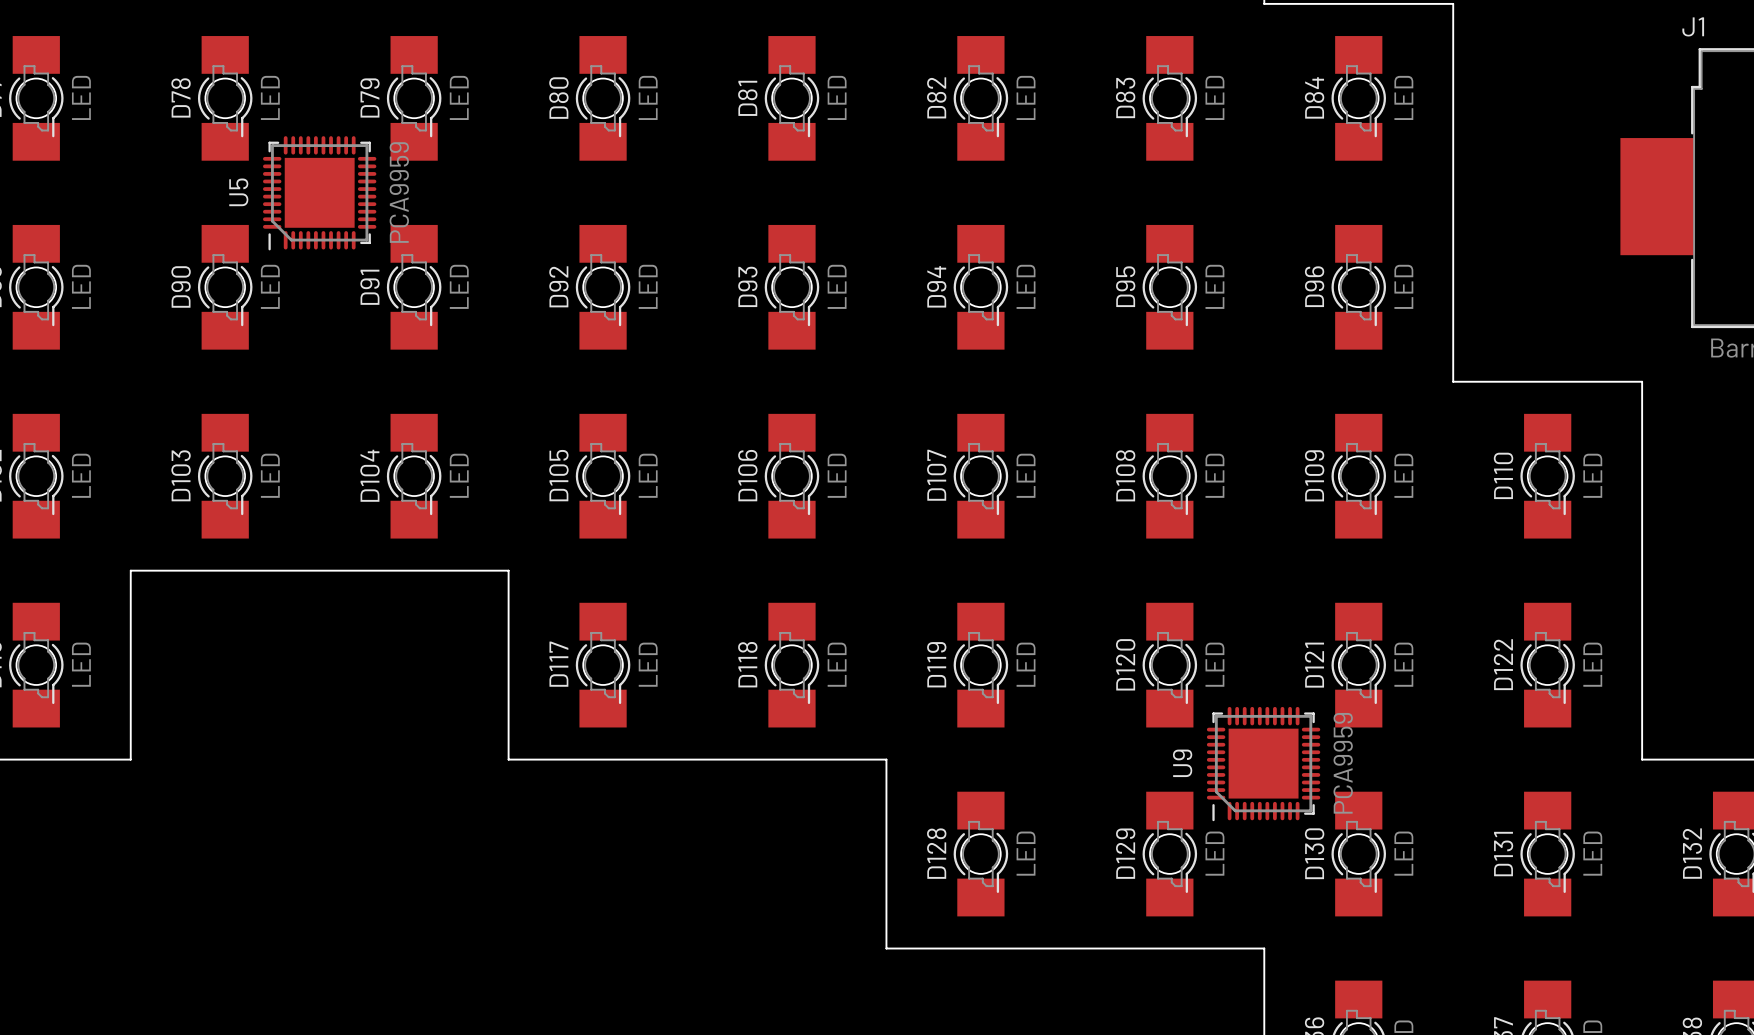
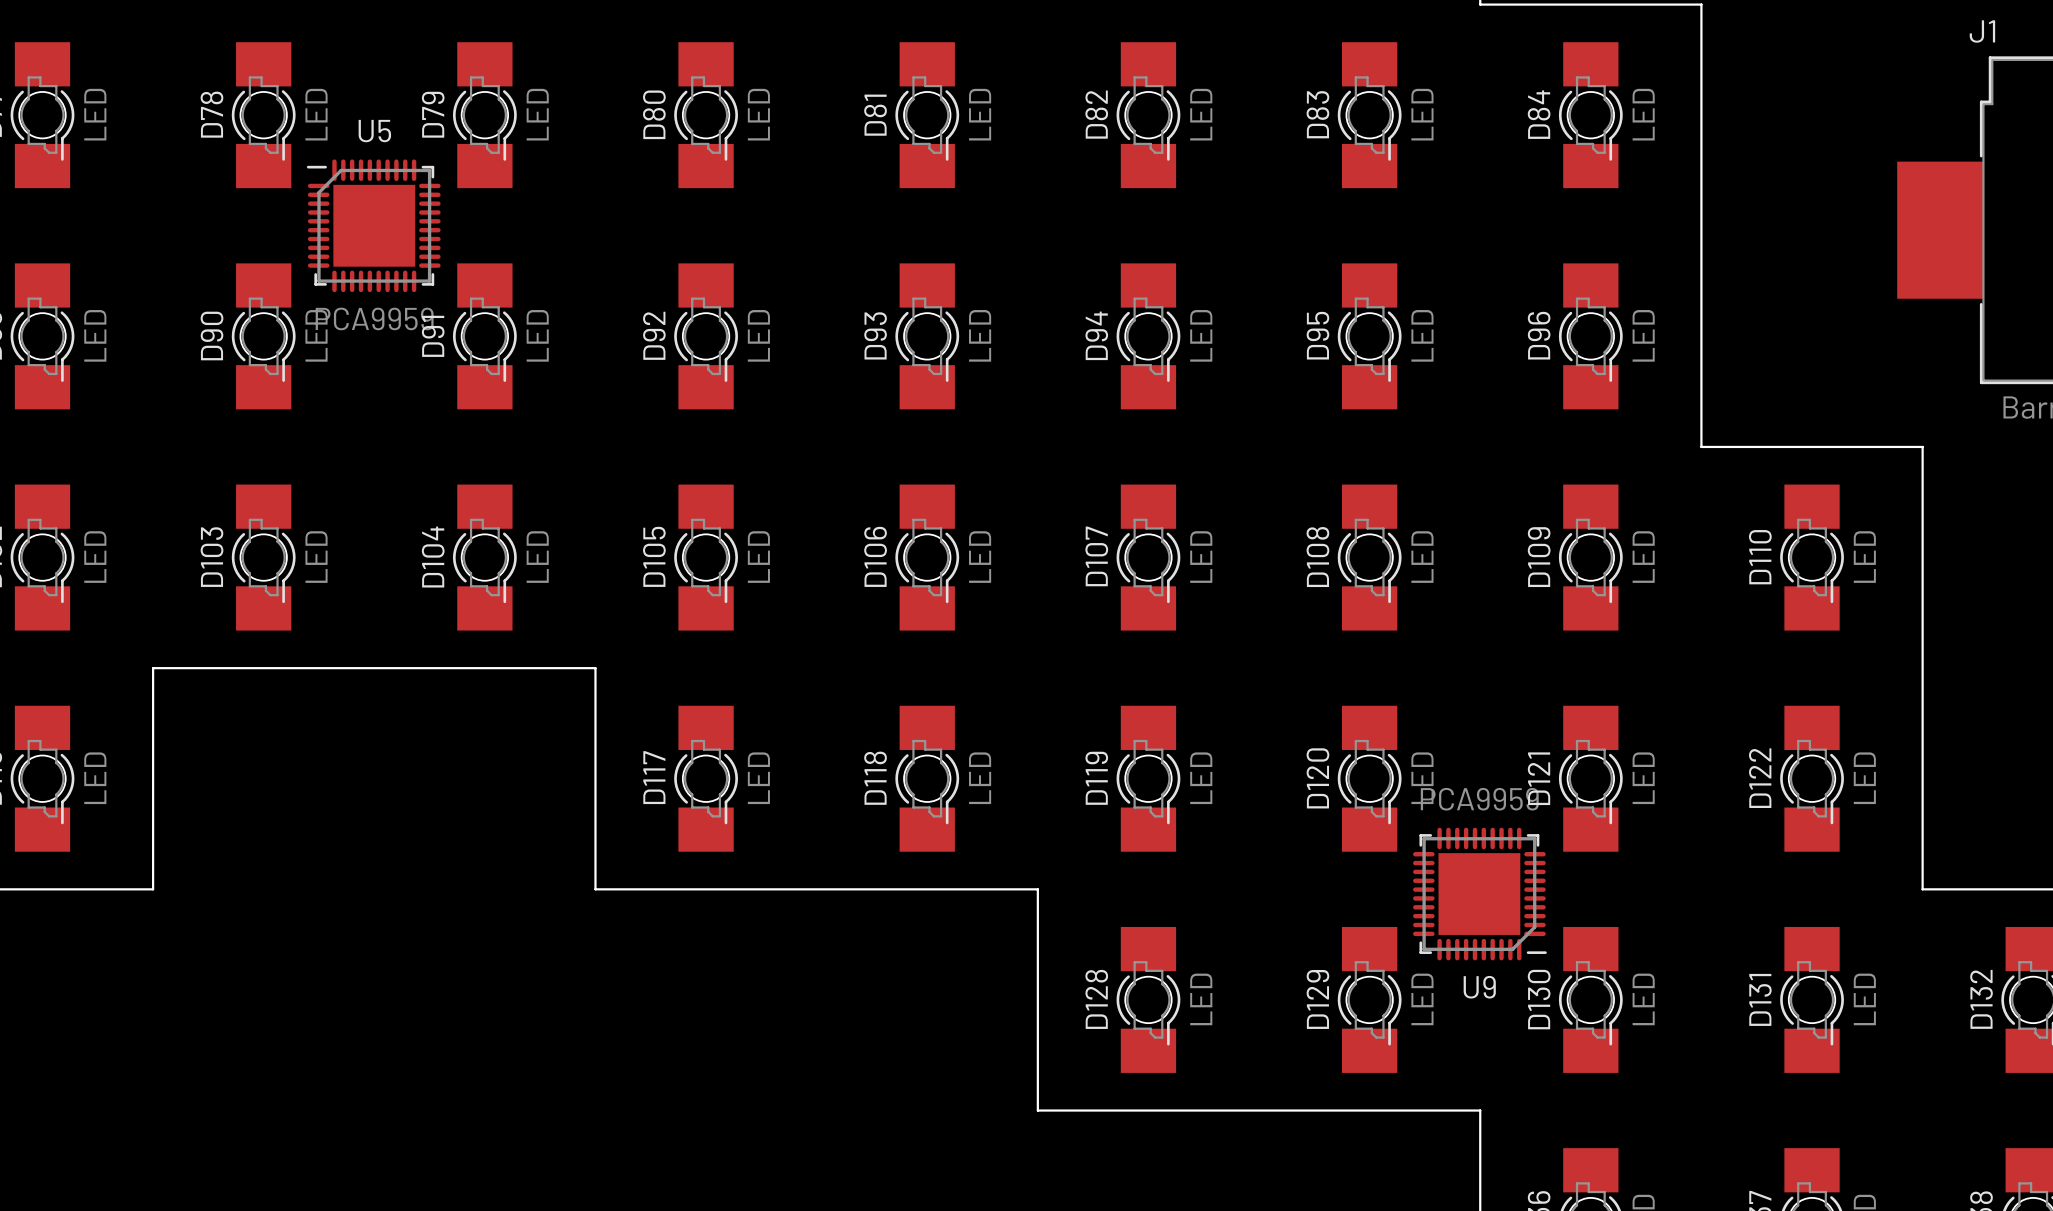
U5 rotation: 0° (319, 193) -> 90° clockwise (373, 225)
U9 rotation: 0° (1263, 764) -> 90° counterclockwise (1479, 894)

